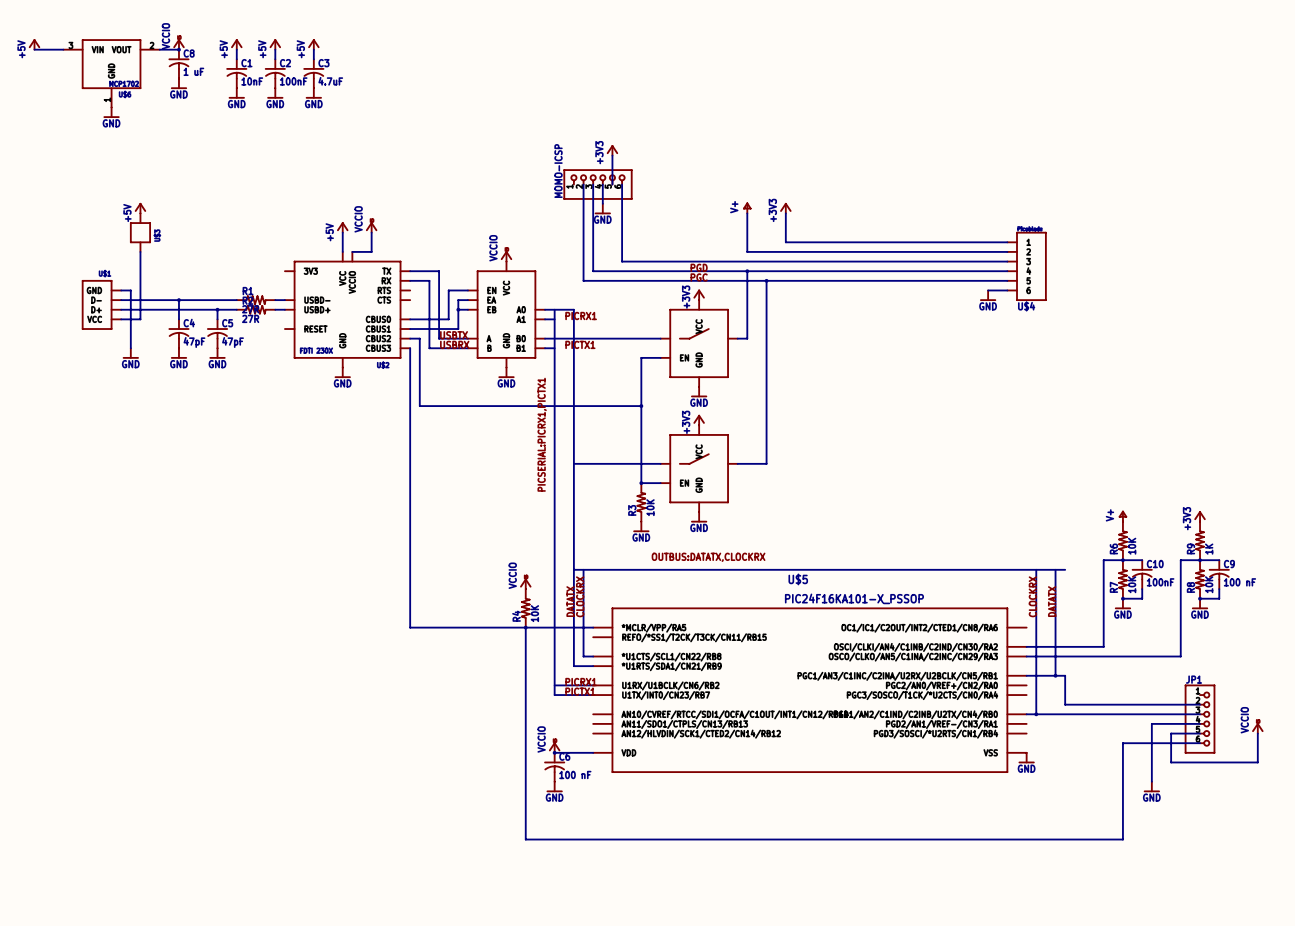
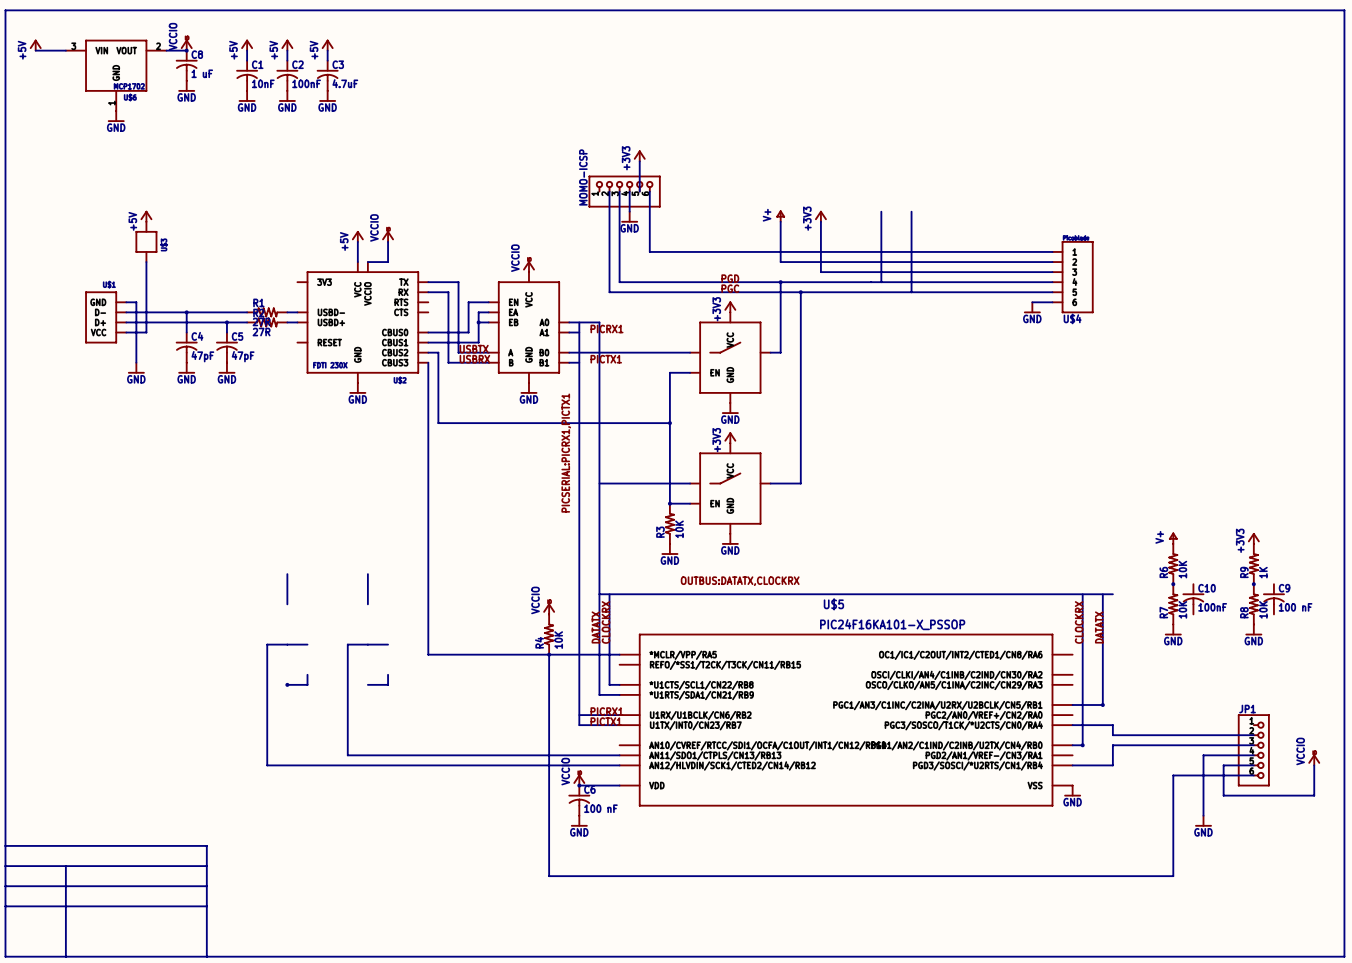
line: none -> (5, 10) (5, 956) (1344, 956) (1344, 10) (5, 10)
wire: none -> (881, 211) (881, 282)
wire: none -> (911, 211) (911, 292)
wire: (622, 242) (622, 261) (785, 261) -> (649, 251) (820, 251) (820, 272)
wire: none -> (287, 574) (287, 604)
wire: none -> (367, 574) (367, 604)
wire: (1142, 560) (1103, 560) (1103, 646) (1026, 646) -> none
wire: (1219, 560) (1180, 560) (1180, 656) (1026, 656) -> none
wire: (1142, 589) (1142, 598) (1122, 598) -> none
wire: (1219, 589) (1219, 598) (1200, 598) -> none
junction: (1122, 598) -> none
junction: (1200, 598) -> none
wire: none -> (307, 644) (267, 644) (267, 765) (619, 765)
wire: none -> (388, 644) (347, 644) (347, 755) (619, 755)
wire: none -> (307, 674) (307, 684) (287, 684)
wire: none -> (388, 674) (388, 684) (367, 684)
junction: none -> (287, 684)
wire: (1055, 675) (1065, 675) (1065, 695) -> (1072, 725) (1112, 725)
wire: (1036, 714) (1065, 714) -> (1072, 765) (1112, 765) (1112, 745)
line: none -> (5, 845) (206, 845) (206, 956)
line: none -> (5, 866) (206, 866)
line: none -> (65, 866) (65, 956)
line: none -> (5, 886) (206, 886)
line: none -> (5, 906) (206, 906)

